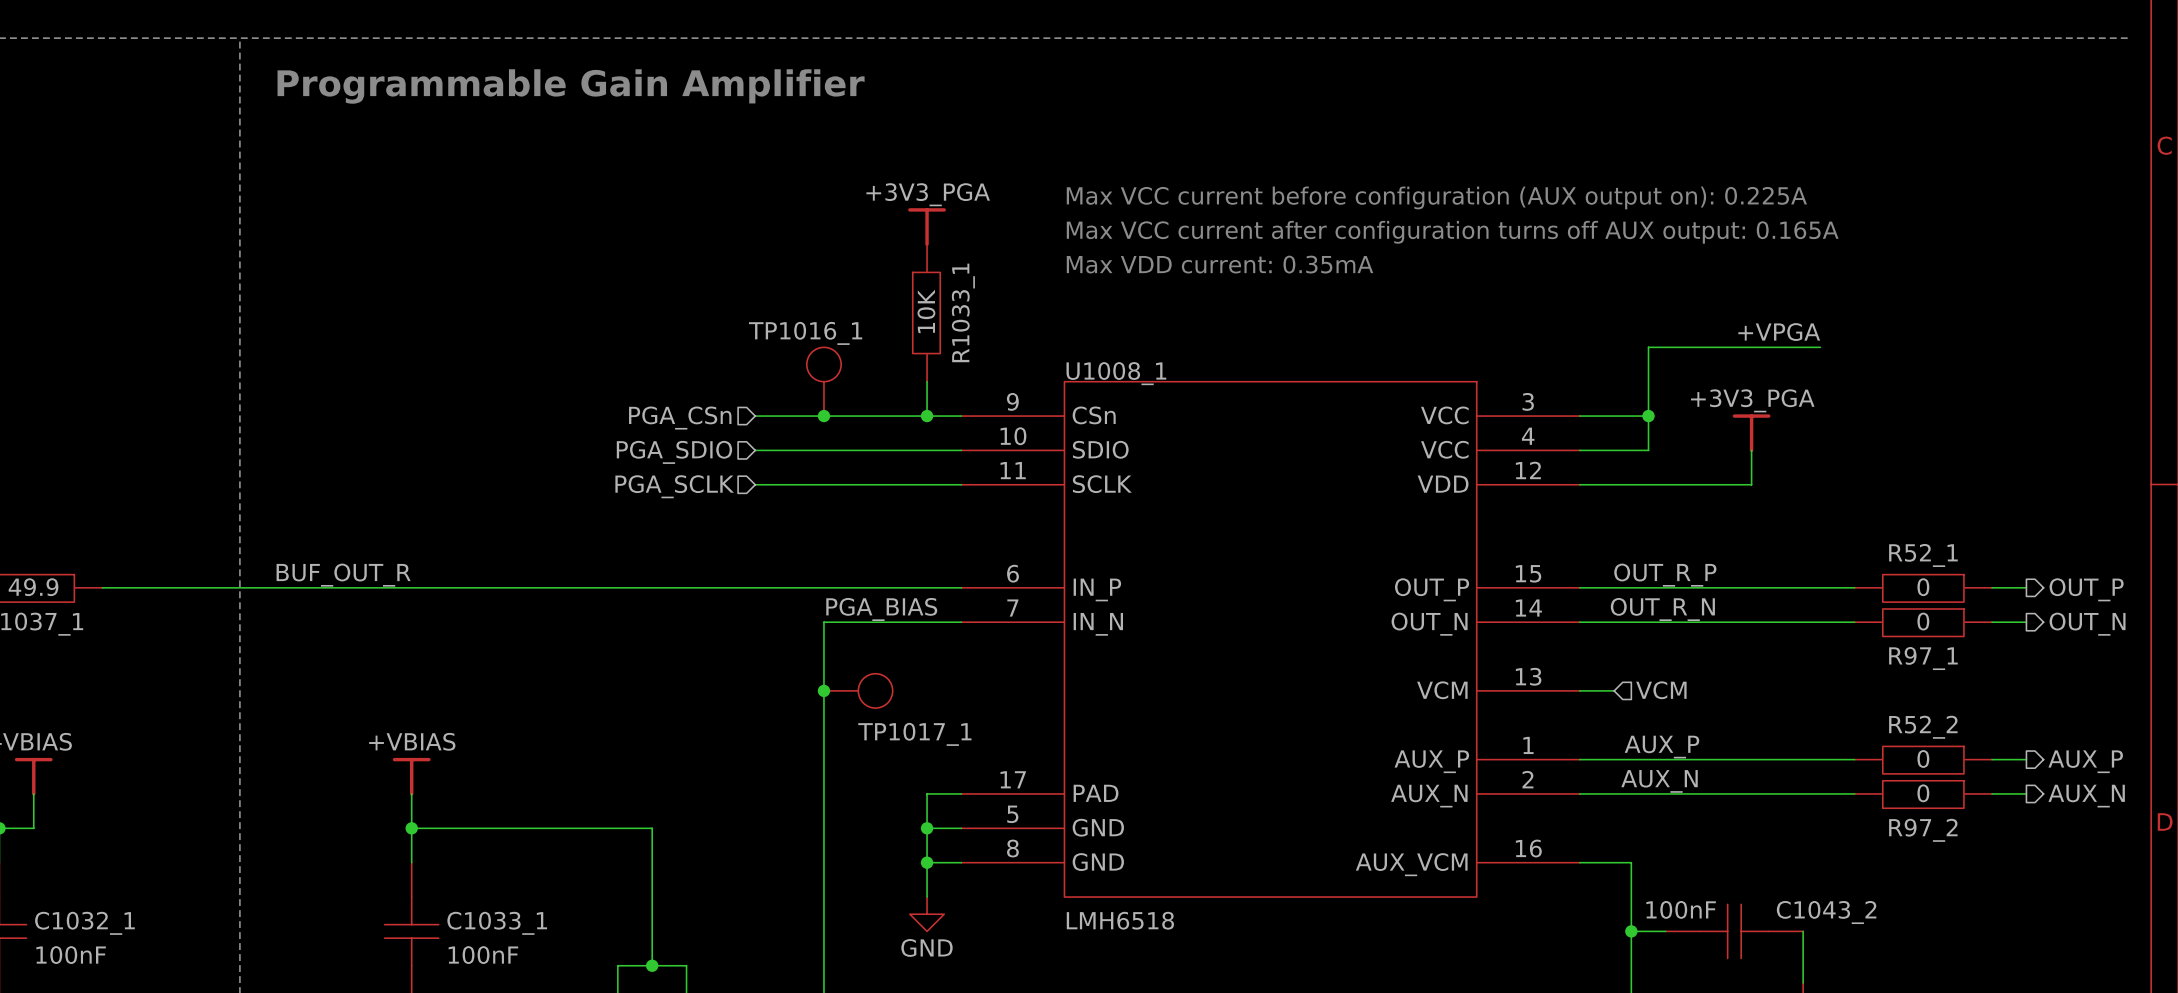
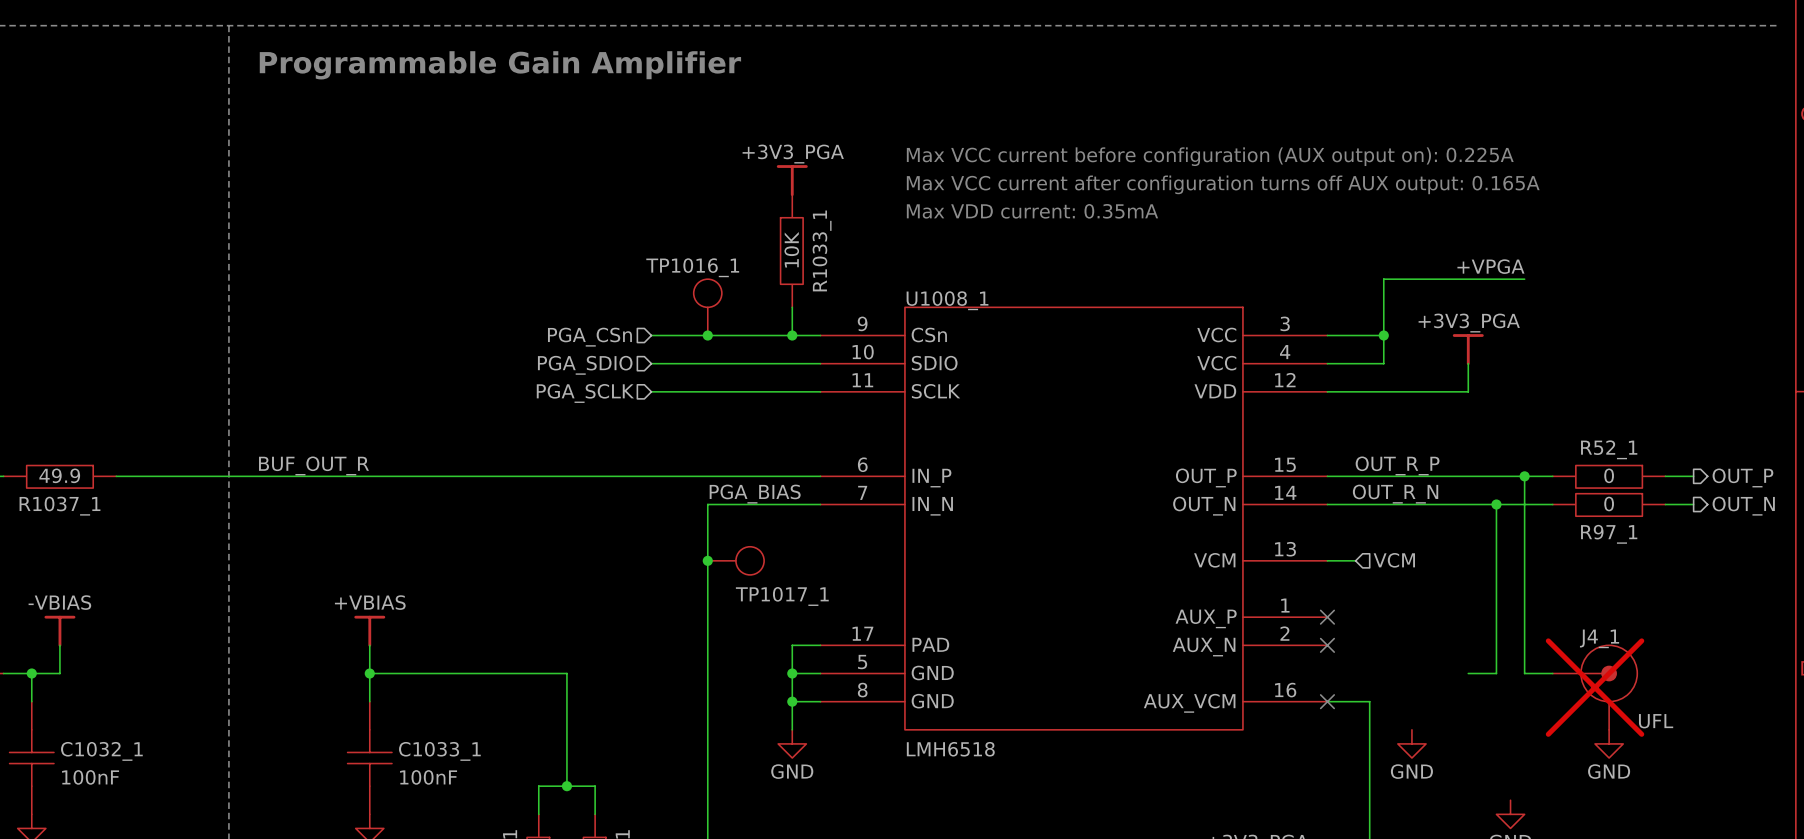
wire: none -> (1524, 476) (1524, 673) (1552, 673)
junction: none -> (1524, 476)
wire: none -> (1496, 504) (1496, 673) (1468, 673)
junction: none -> (1496, 504)
label: AUX_P (1662, 747) -> none
wire: (1579, 759) (1854, 759) -> none
no-connect mark: none -> (1327, 617)
wire: (1992, 759) (2026, 759) -> none
R52_2: 0 (1923, 760) -> none
hierarchical label: AUX_P (2085, 761) -> none
label: AUX_N (1659, 781) -> none
wire: (1579, 793) (1854, 793) -> none
no-connect mark: none -> (1327, 645)
wire: (1992, 793) (2026, 793) -> none
R97_2: 0 (1923, 794) -> none
hierarchical label: AUX_N (2086, 796) -> none
J4_1: none -> UFL (1595, 687)
no-connect mark: none -> (1327, 701)
power symbol: none -> GND (1411, 743)
power symbol: none -> GND (1609, 743)
wire: (1631, 931) (1665, 931) -> none
junction: (1631, 931) -> none
C1043_2: 100nF (1734, 931) -> none
wire: (1803, 931) (1803, 982) -> none

